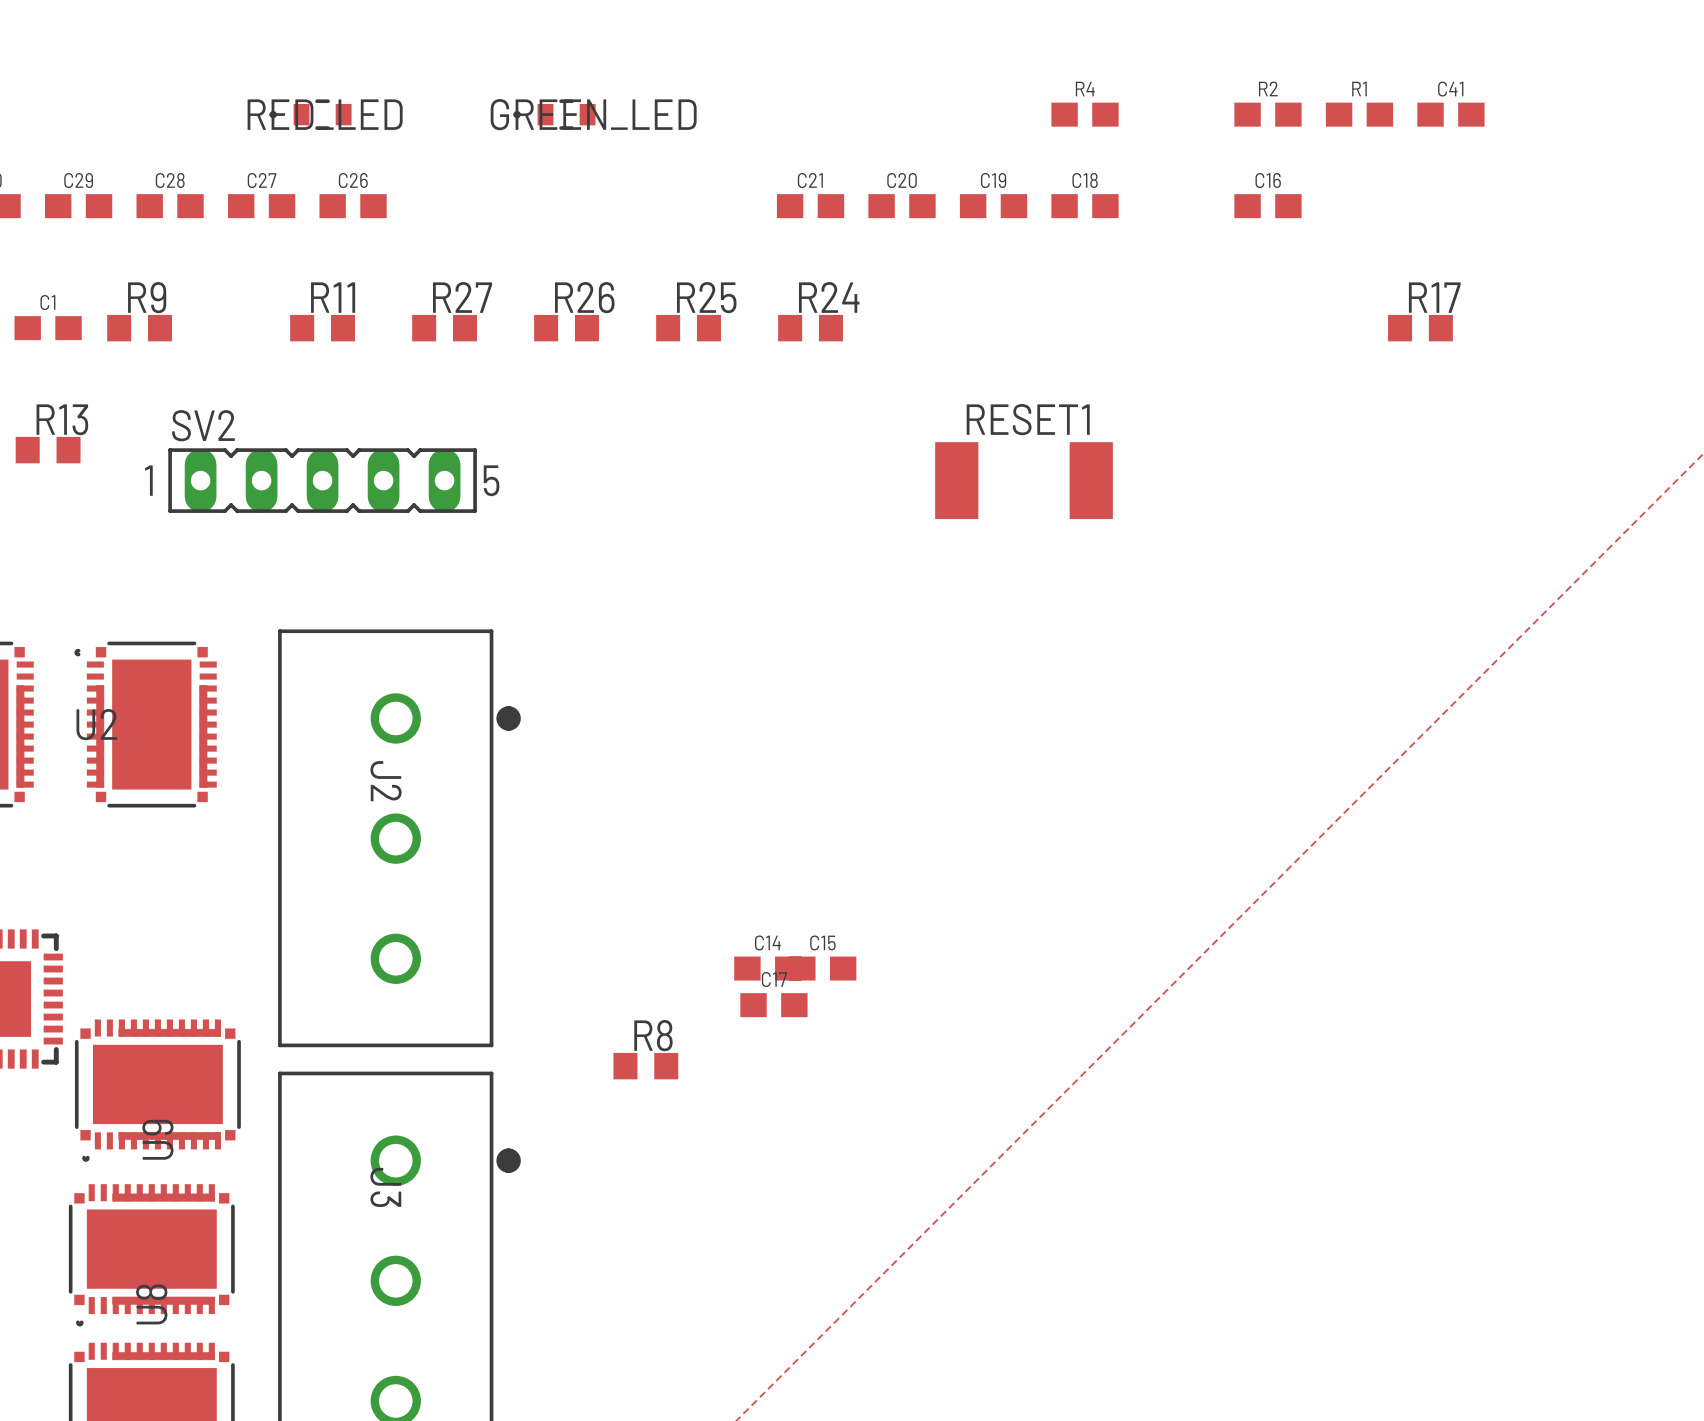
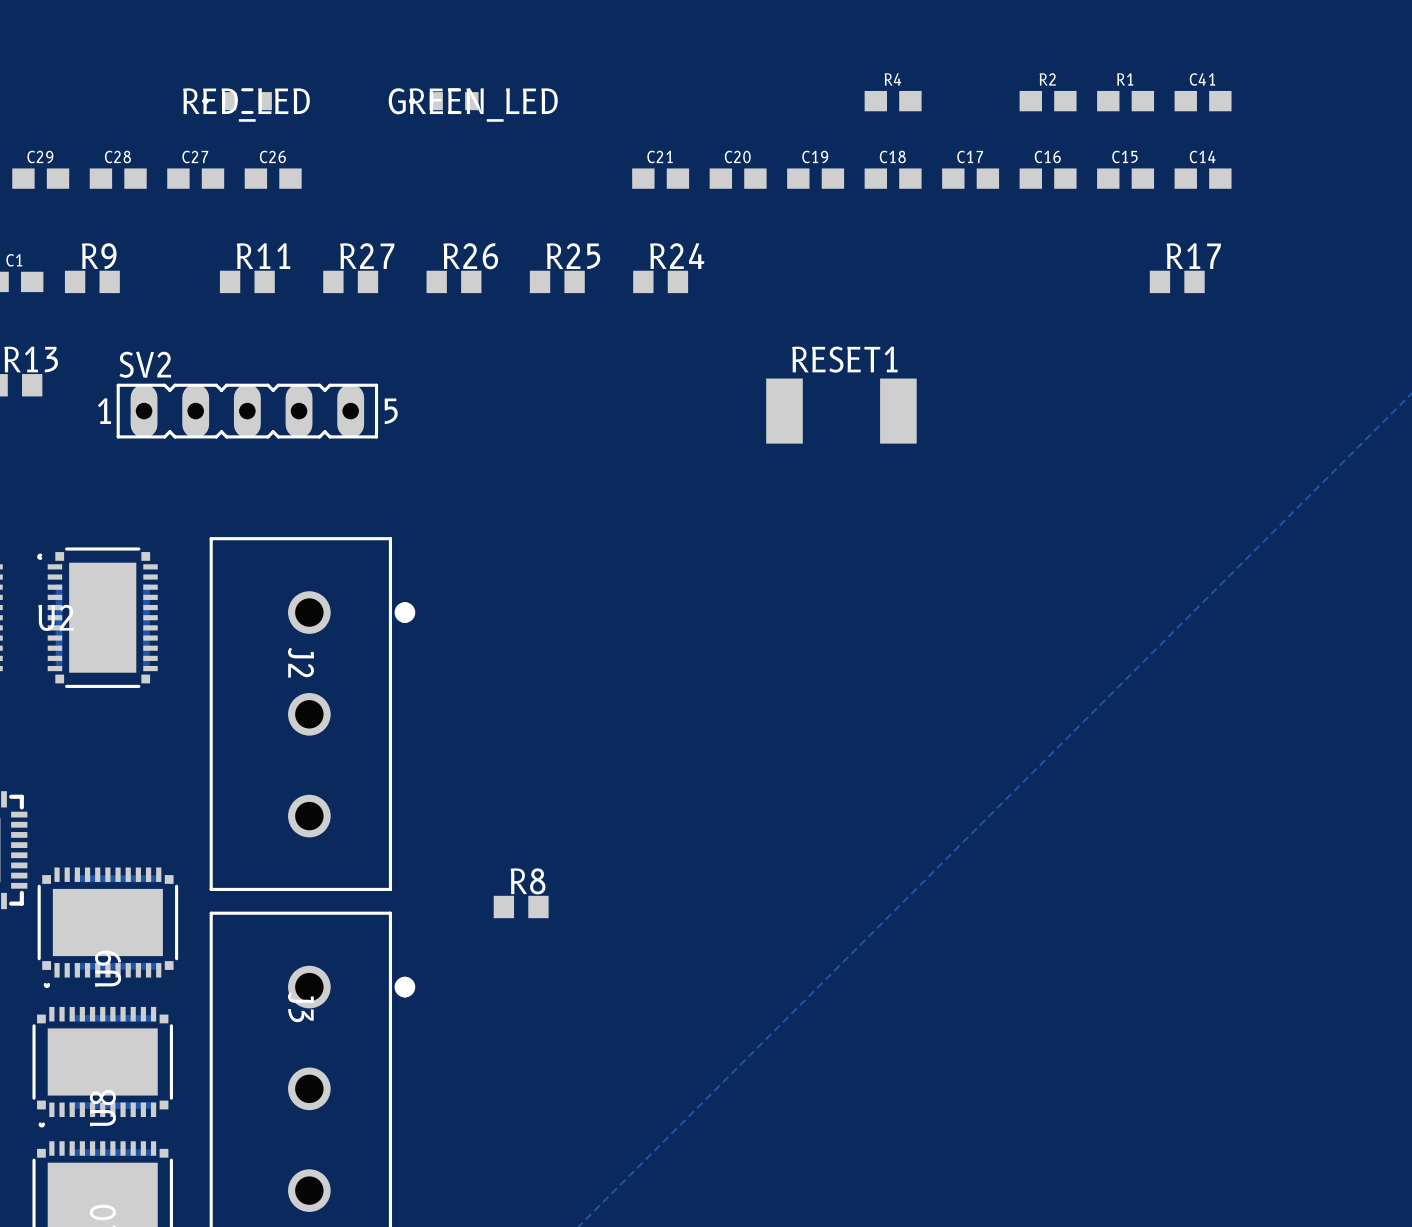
C14 position: (767, 968) -> (1203, 178)
C15 position: (822, 968) -> (1125, 178)
C17 position: (773, 1005) -> (970, 178)

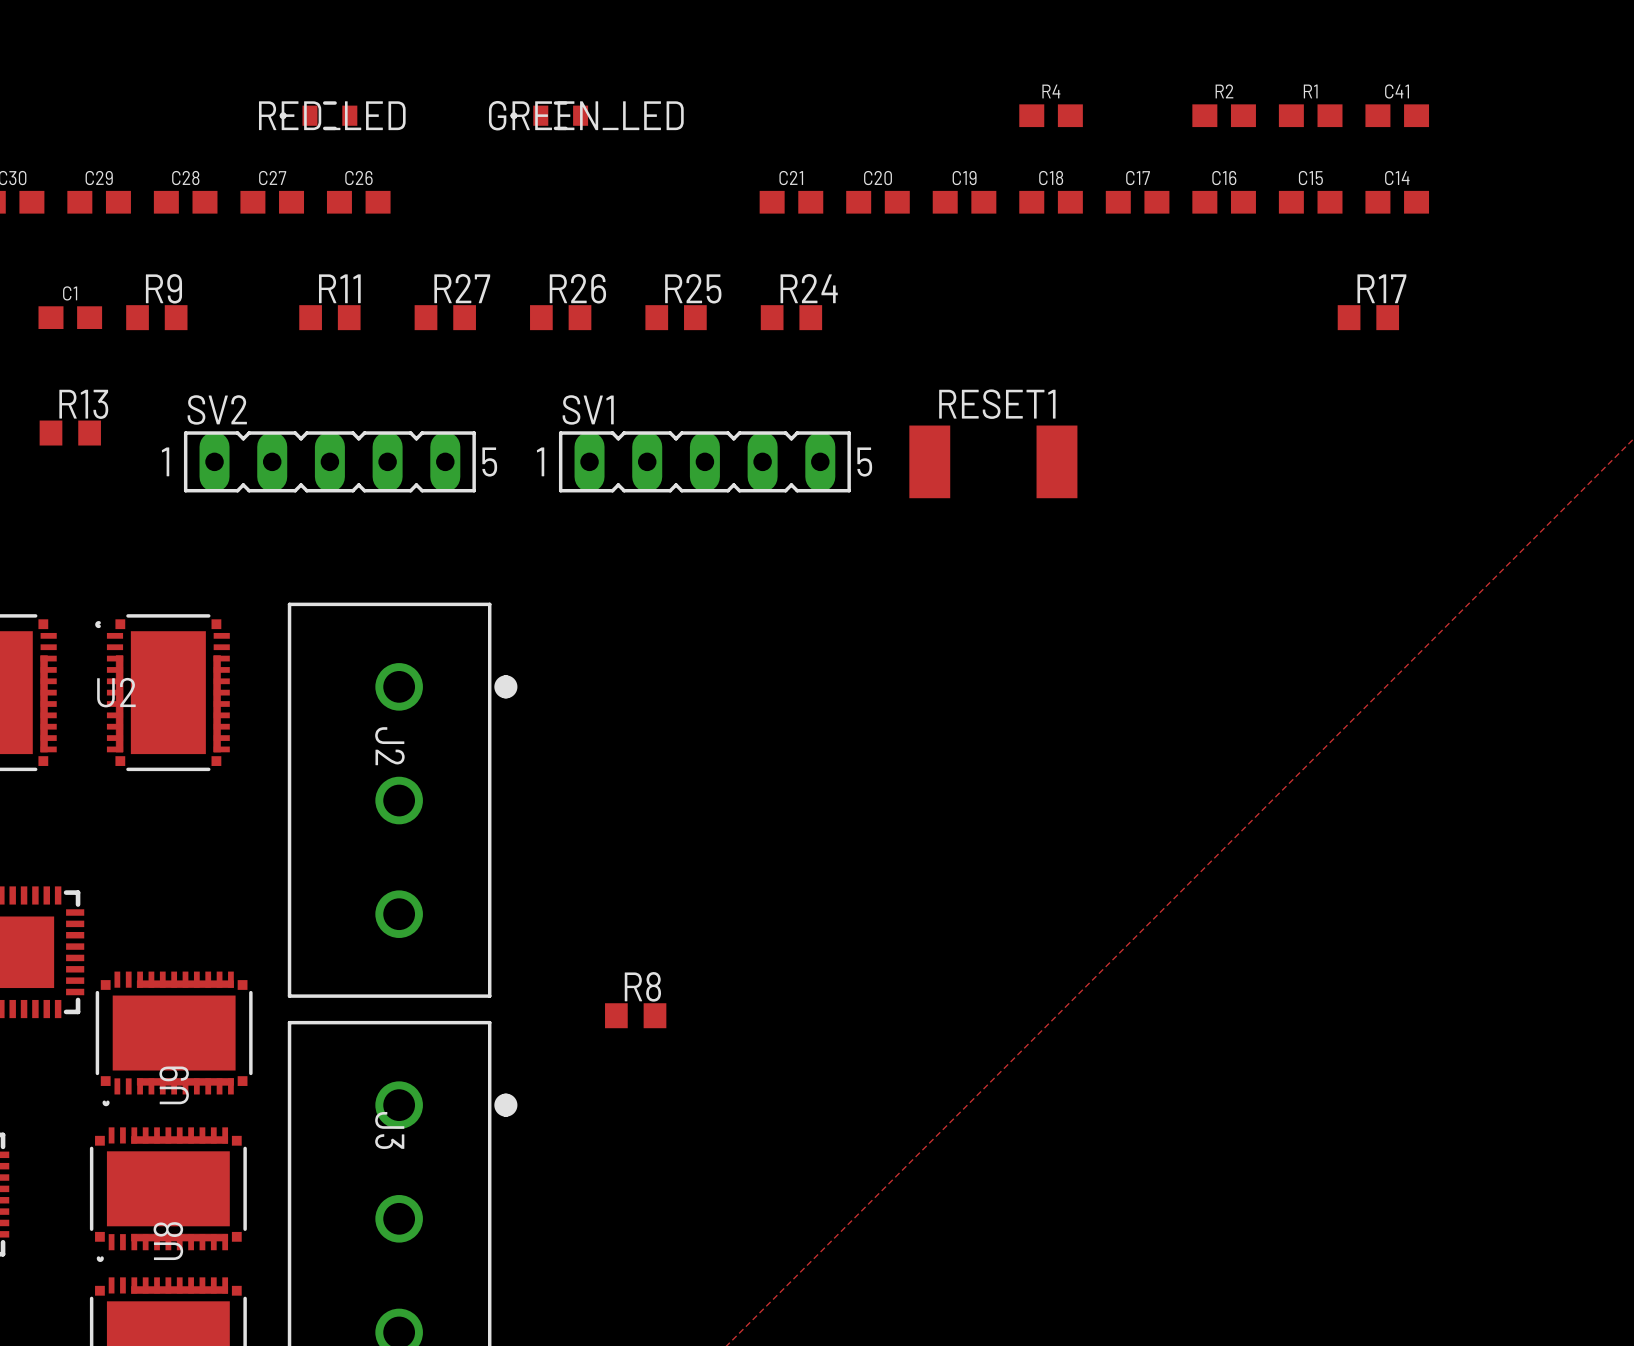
SV1: none -> (704, 461)

